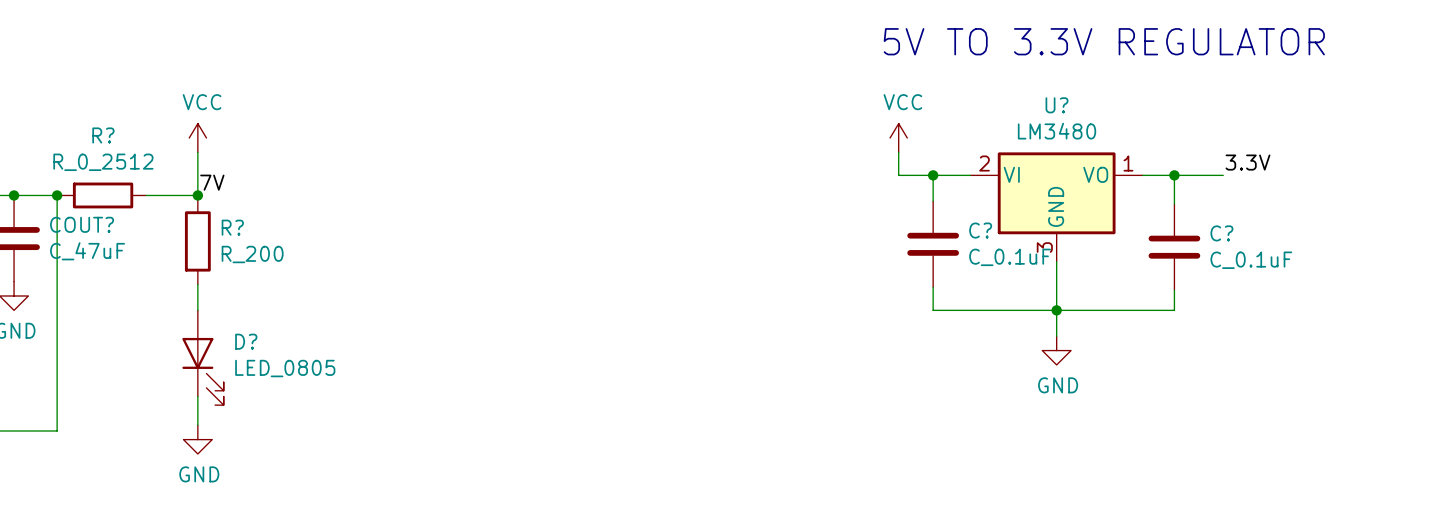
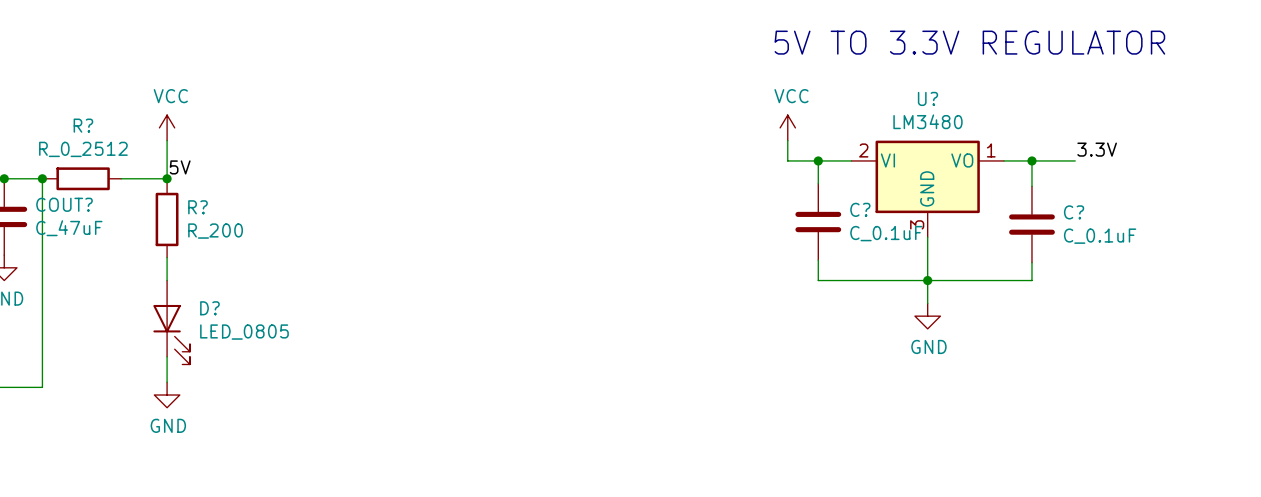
label: 7V (212, 182) -> 5V (180, 167)

